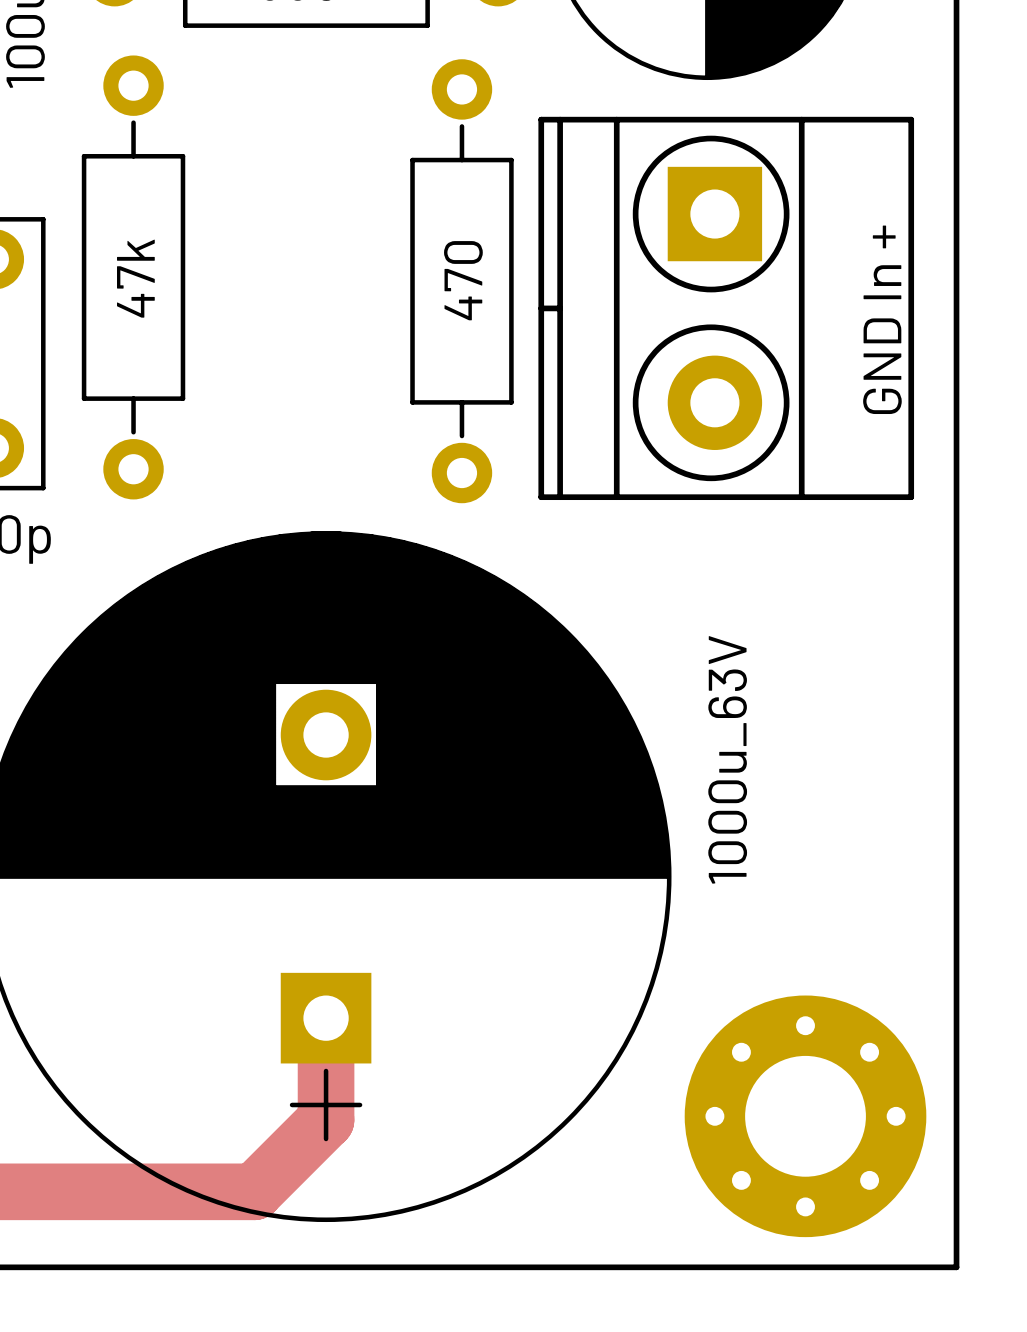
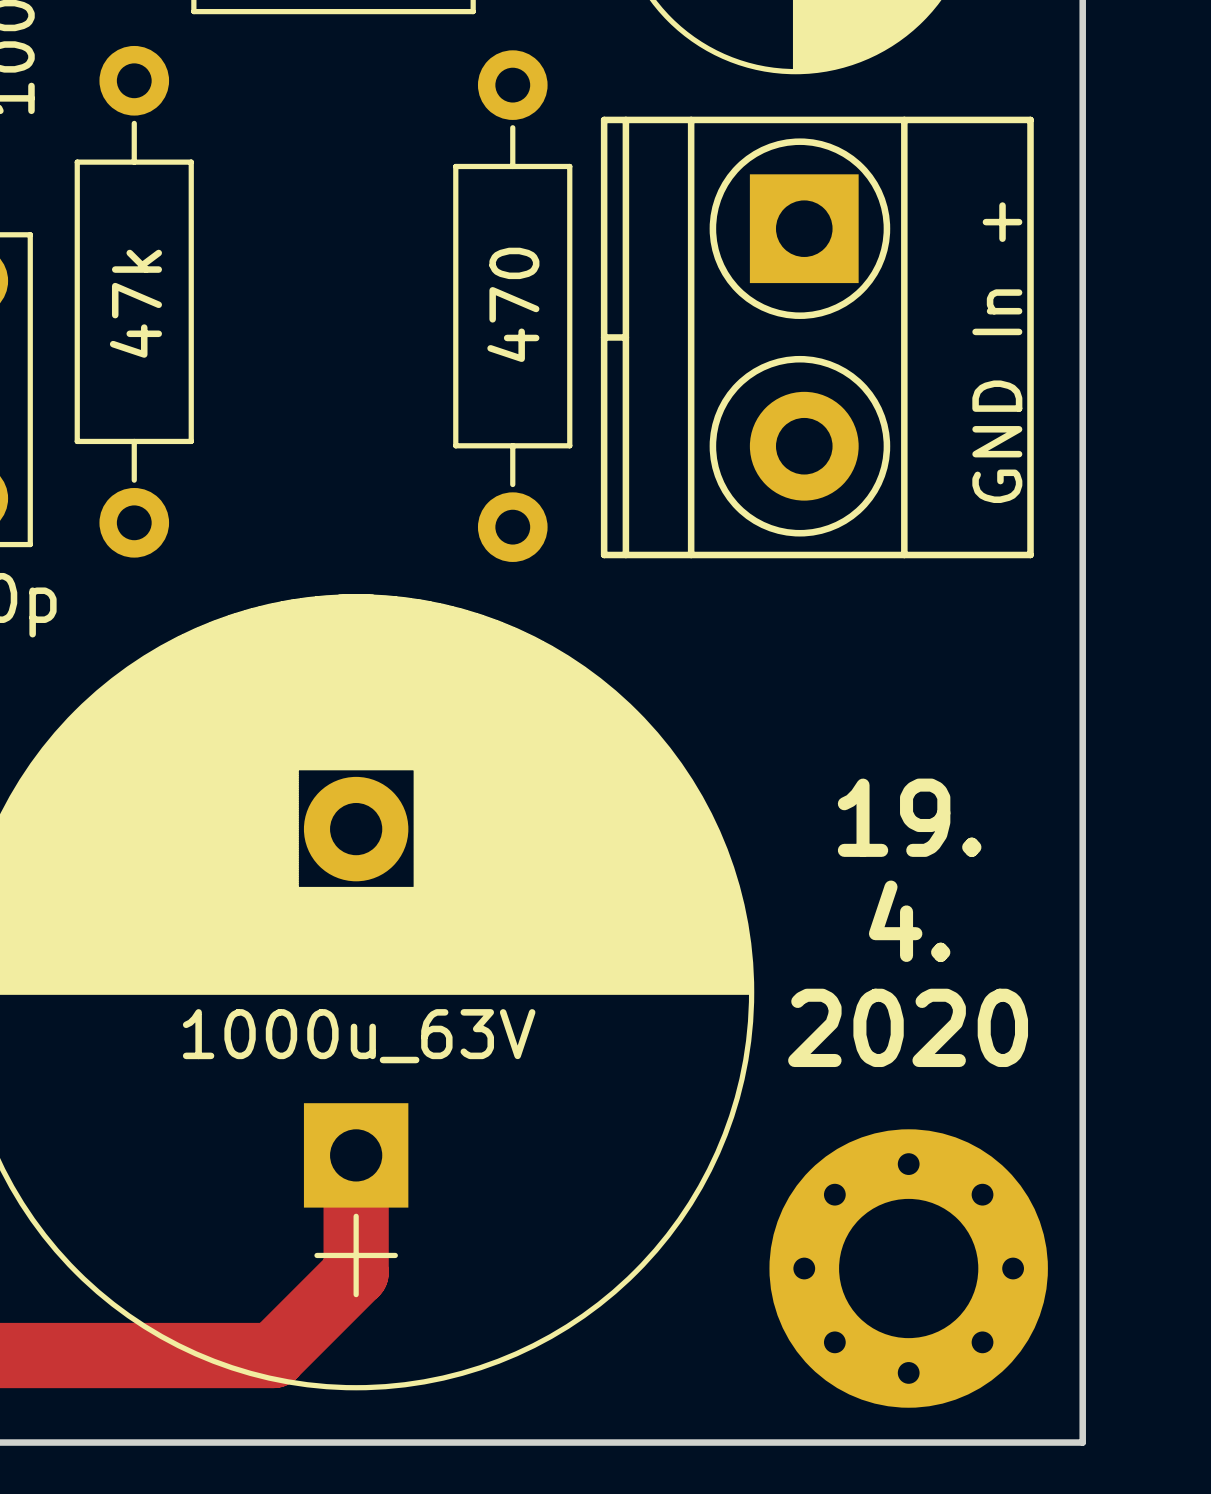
text: none -> 19. (909, 817)
part value rotation: 0° (727, 759) -> 90° clockwise (359, 1036)
part value position: 1000u_63V (727, 759) -> 1000u_63V (359, 1036)
text: none -> 4. (909, 921)
text: none -> 2020 (908, 1027)

